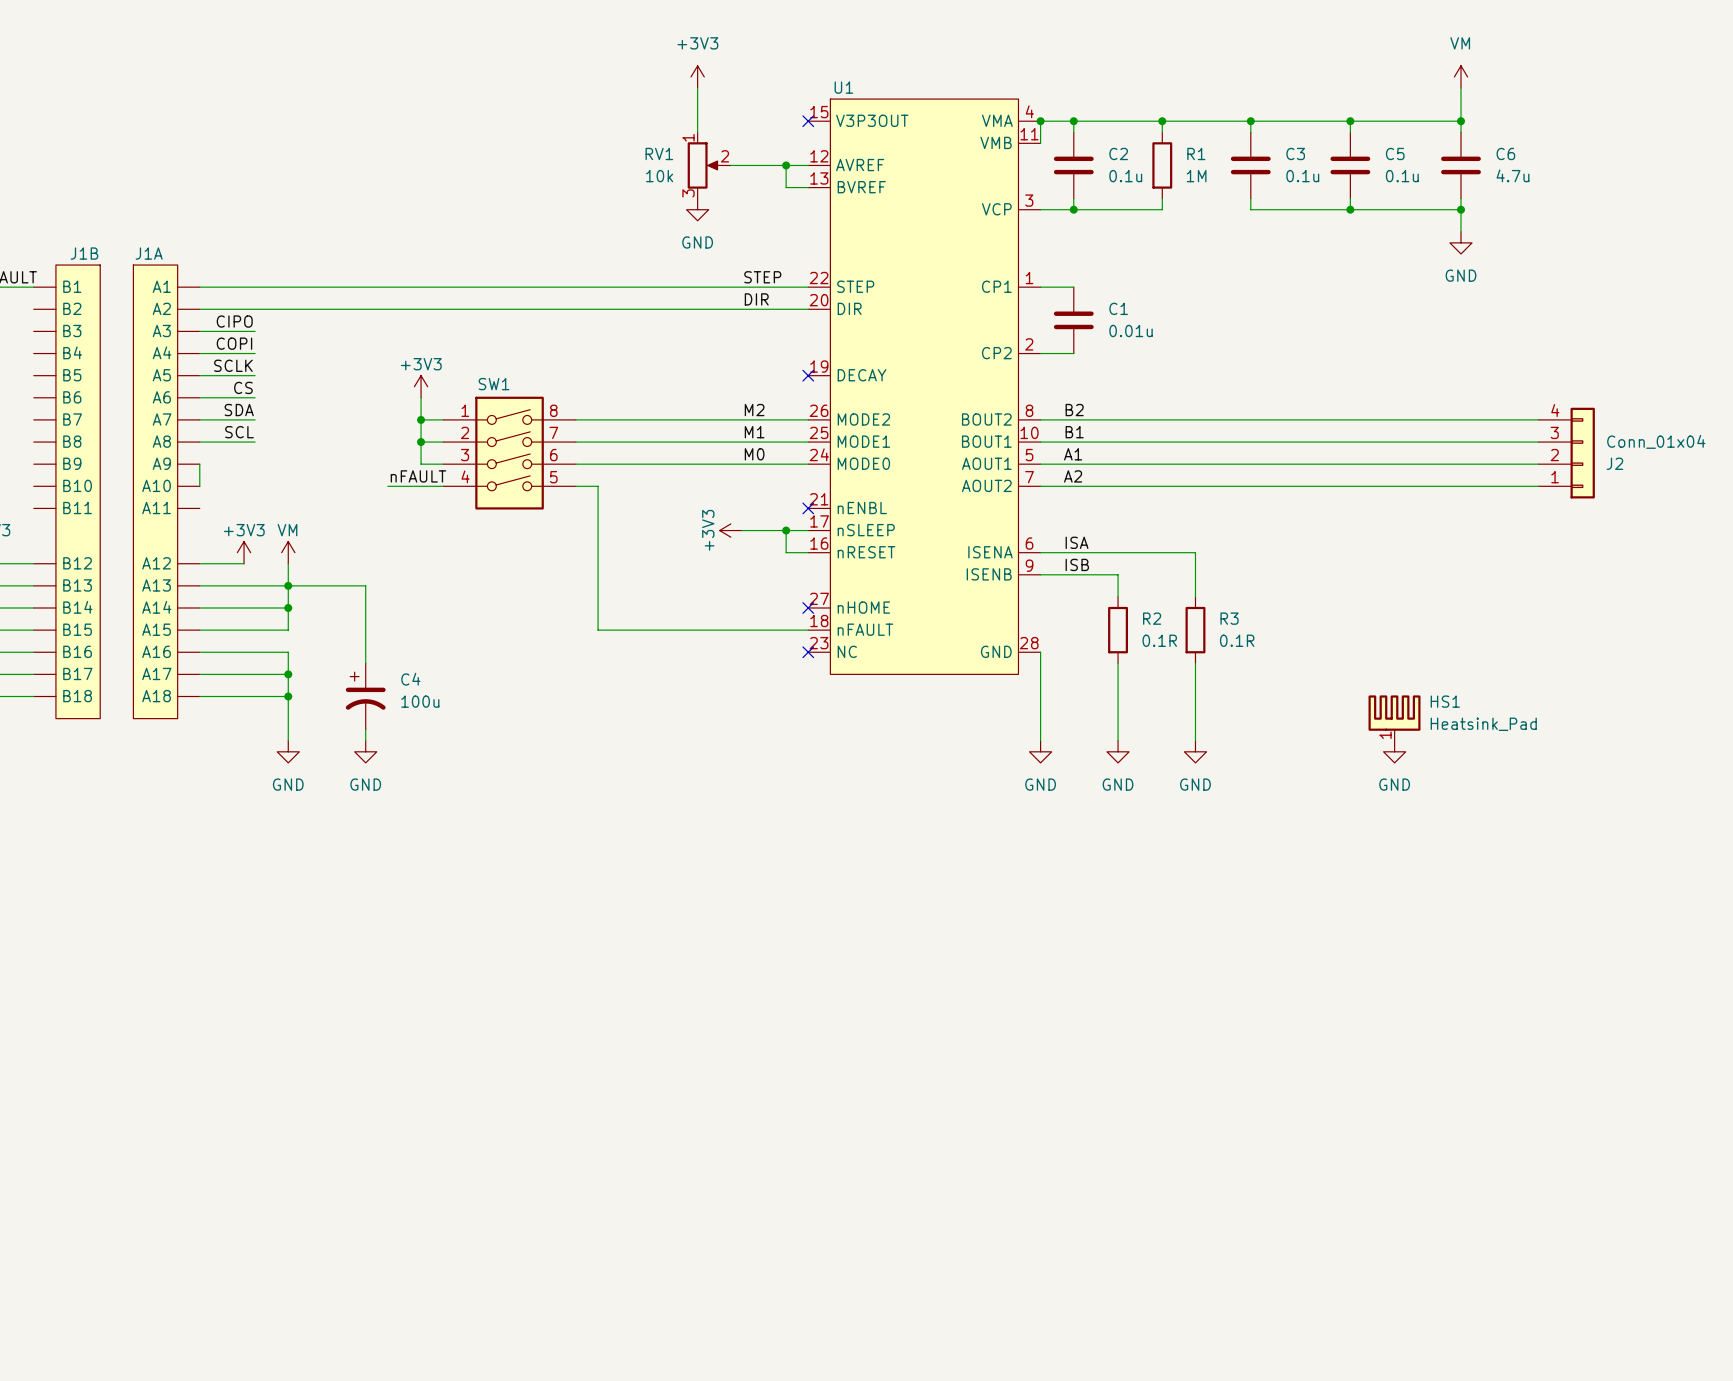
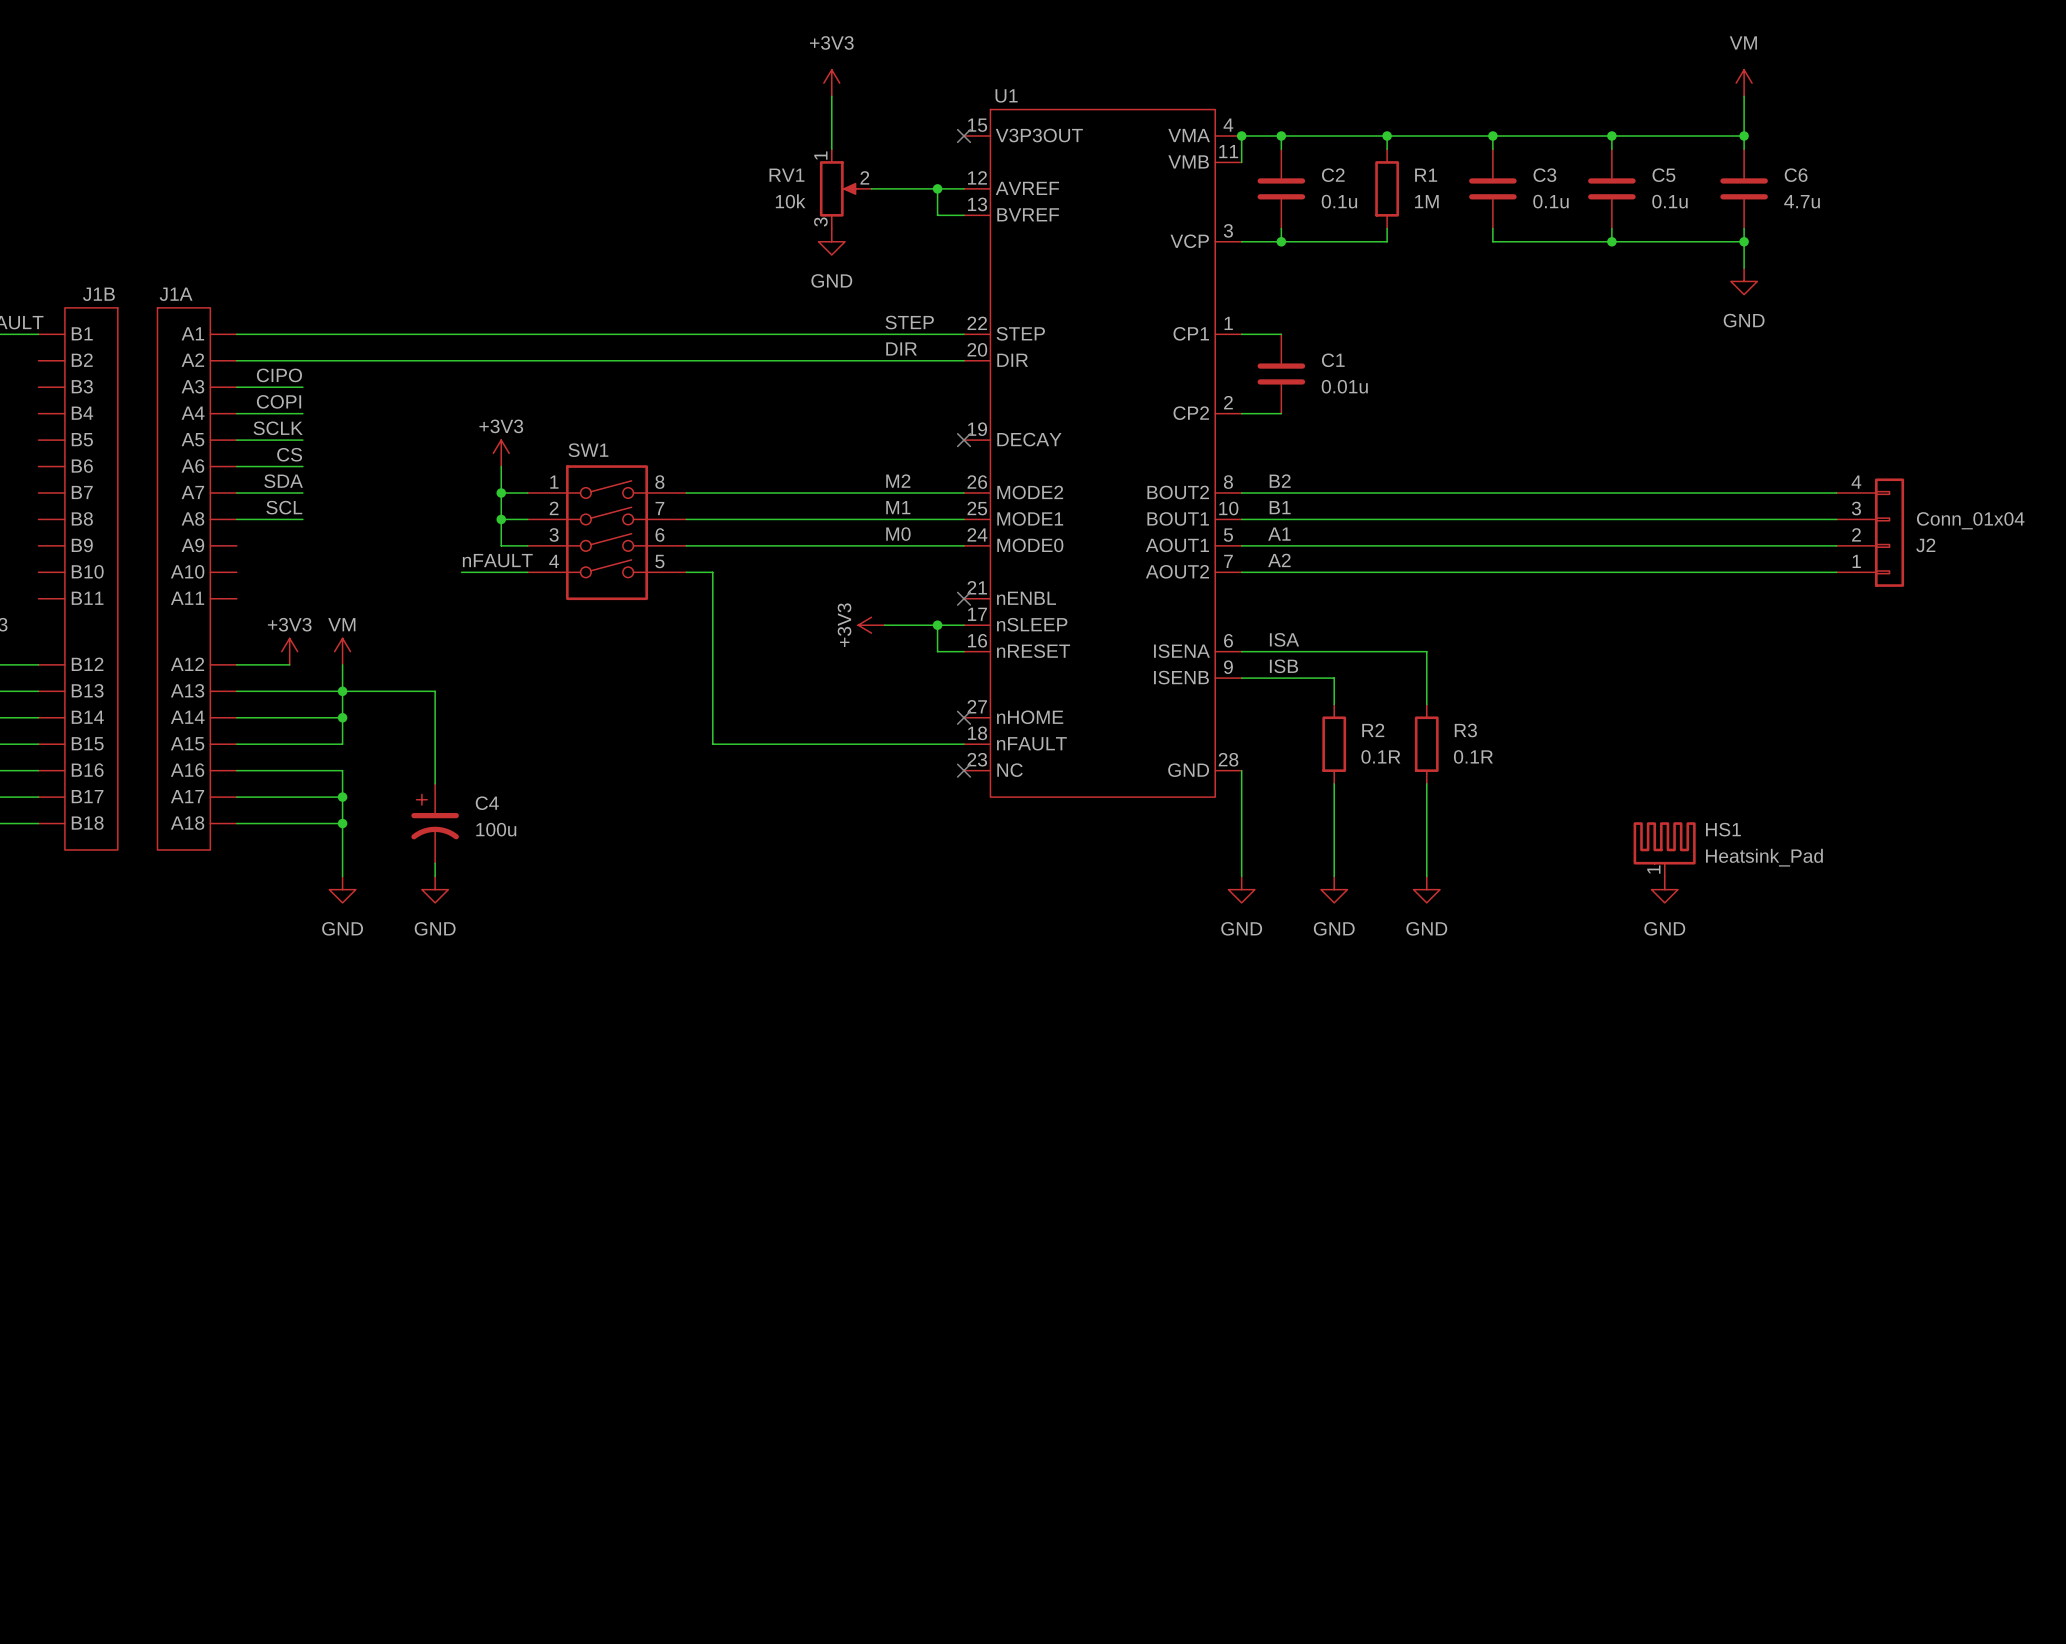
wire: (199, 464) (199, 486) -> none

